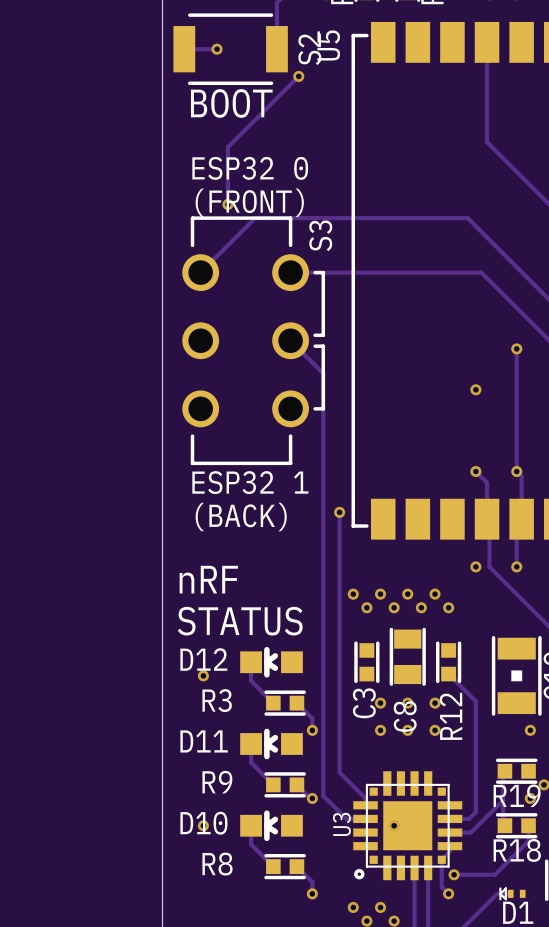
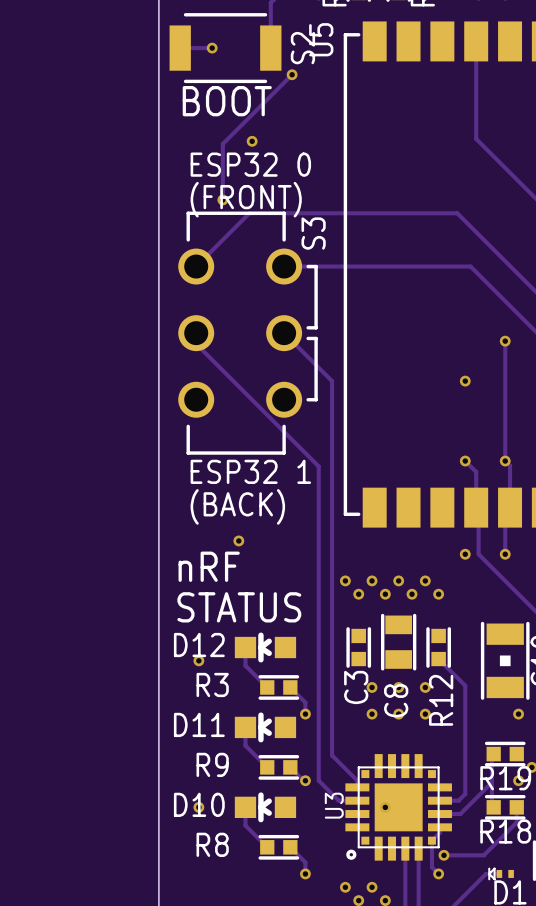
via: none -> (252, 141)
track: (323, 373) (323, 795) (326, 798) -> (196, 333) (196, 343) (318, 466) (318, 780)
track: none -> (316, 365) (332, 381) (332, 500)
via position: (339, 512) -> (238, 540)

